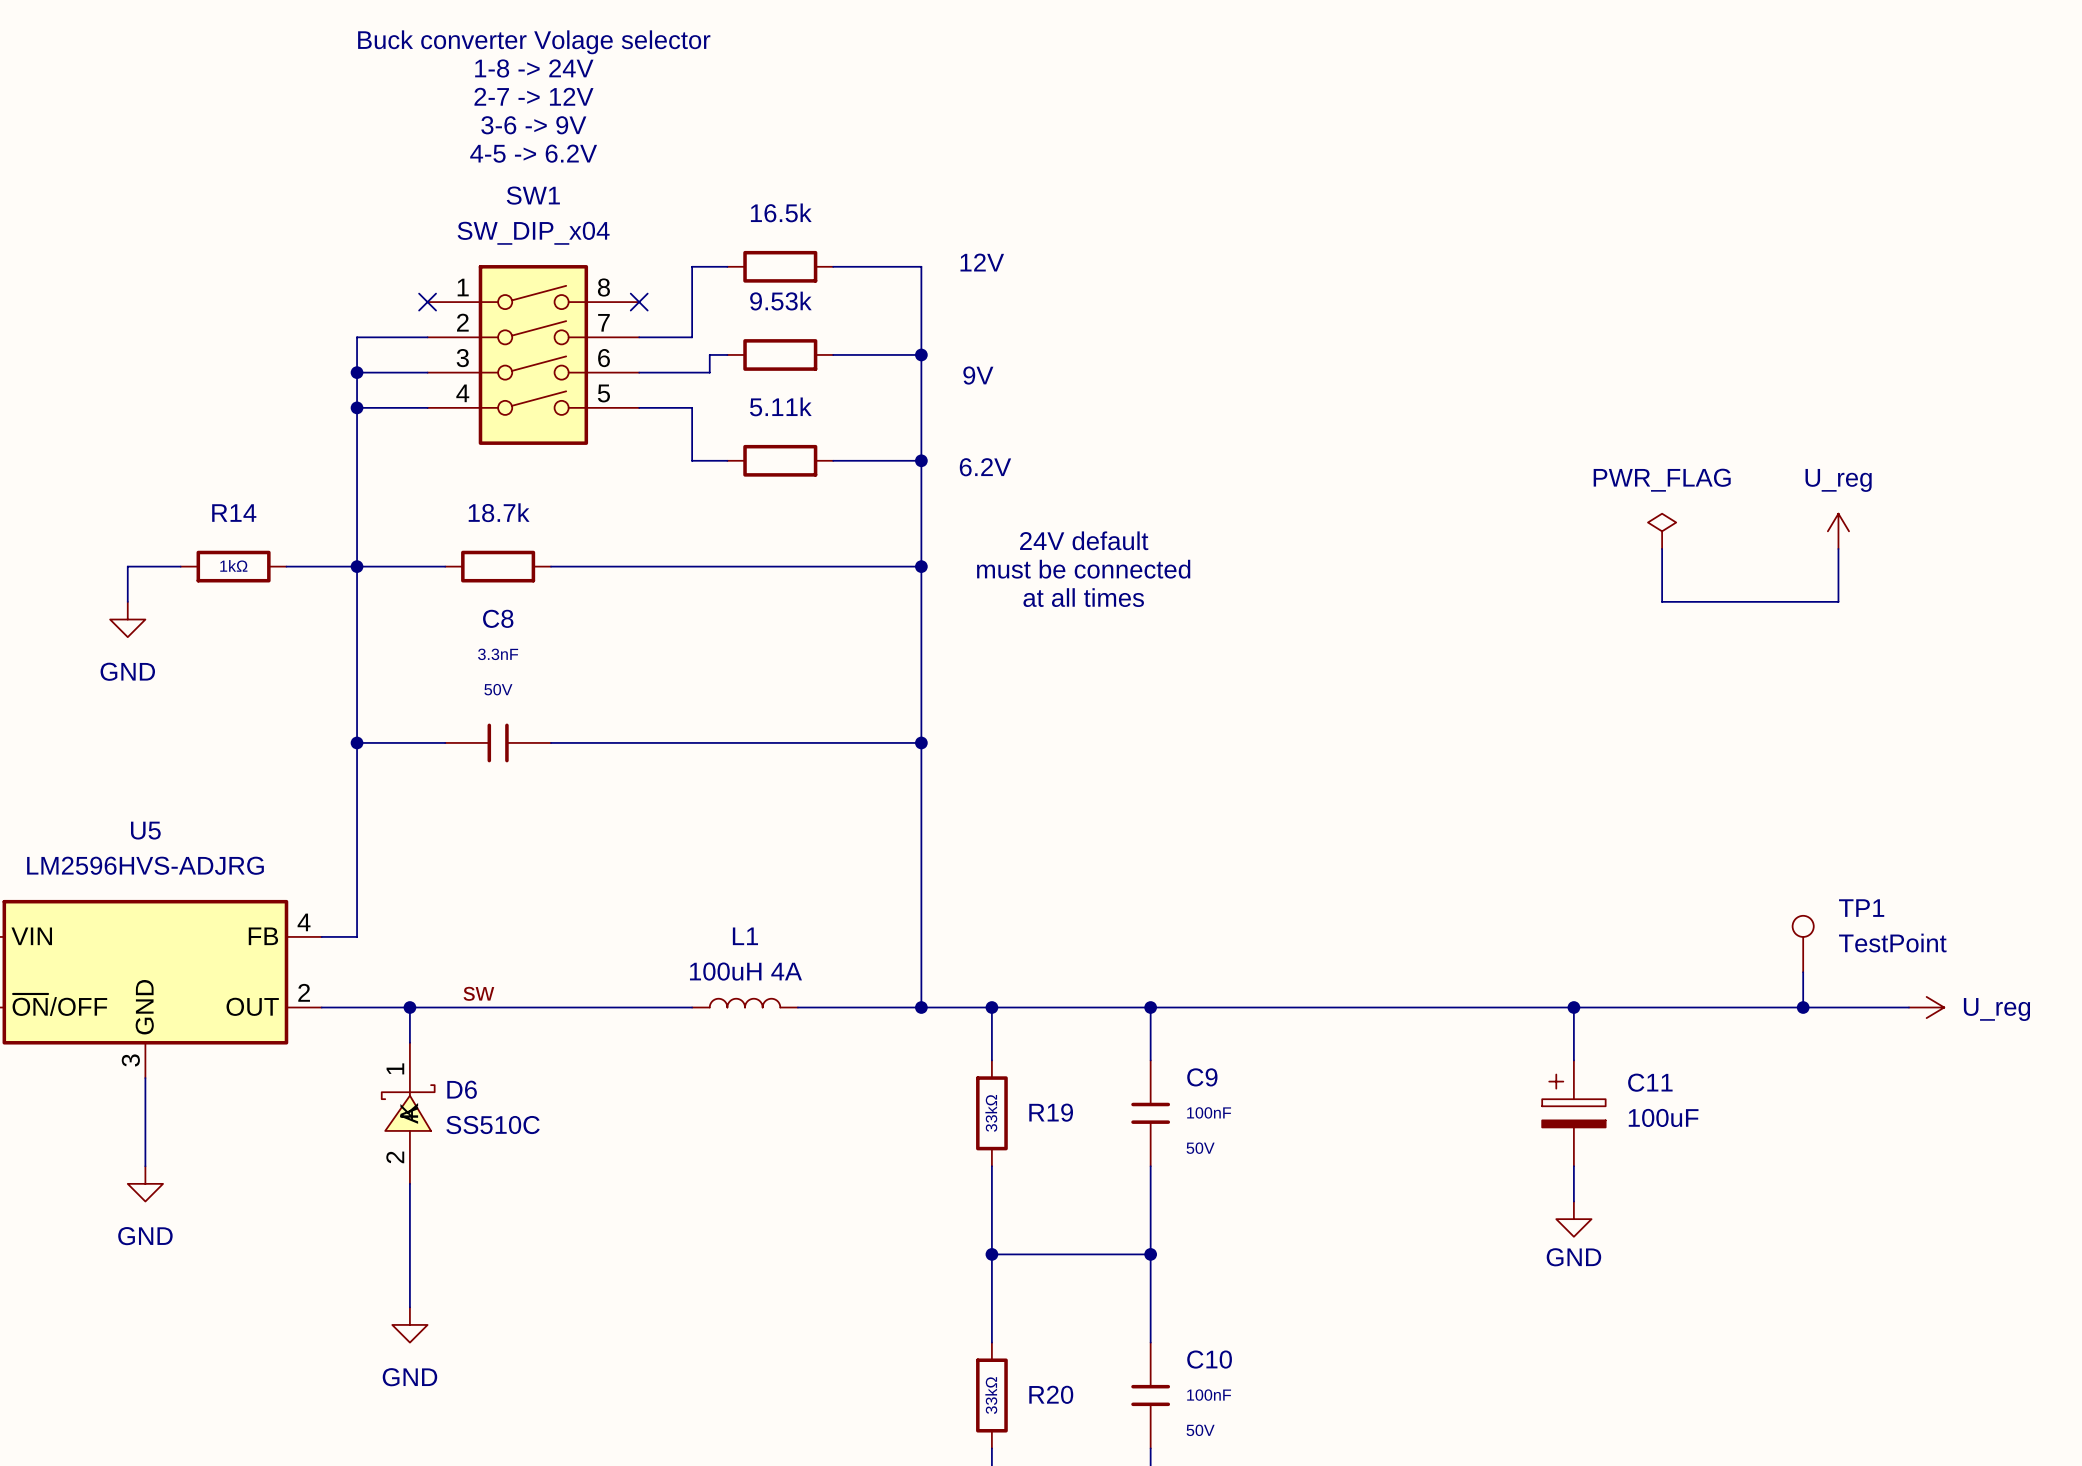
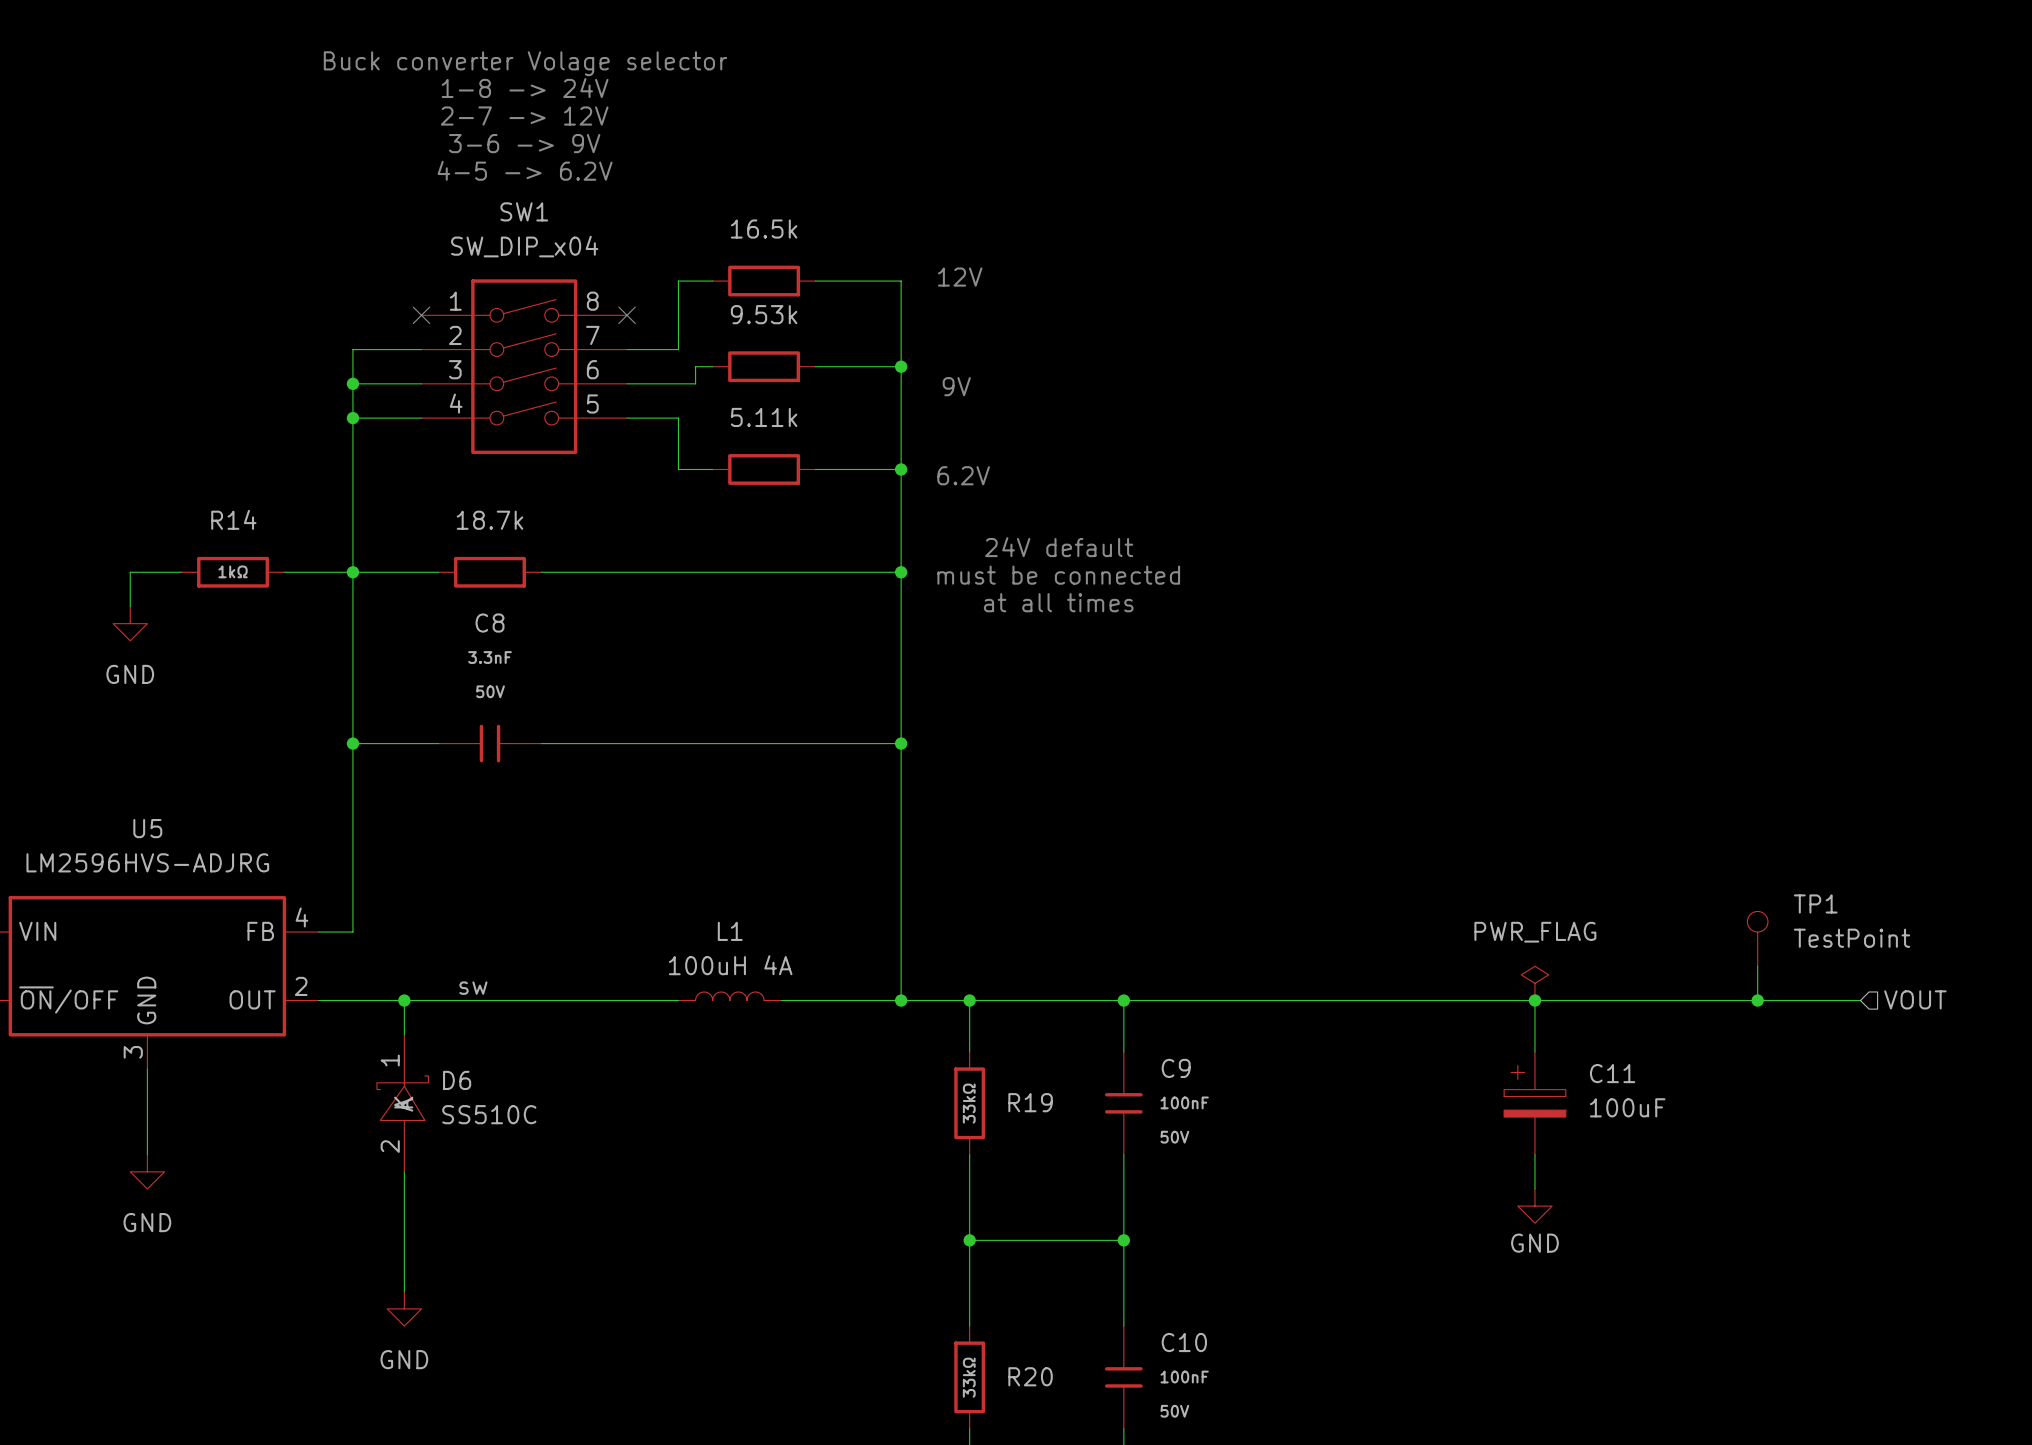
power symbol: PWR_FLAG (1662, 531) -> none
power symbol: U_reg (1838, 531) -> none
wire: (1662, 548) (1662, 601) (1838, 601) (1838, 548) -> none
power symbol: none -> PWR_FLAG (1534, 983)
hierarchical label: none -> VOUT (1915, 999)
power symbol: U_reg (1926, 1007) -> none

